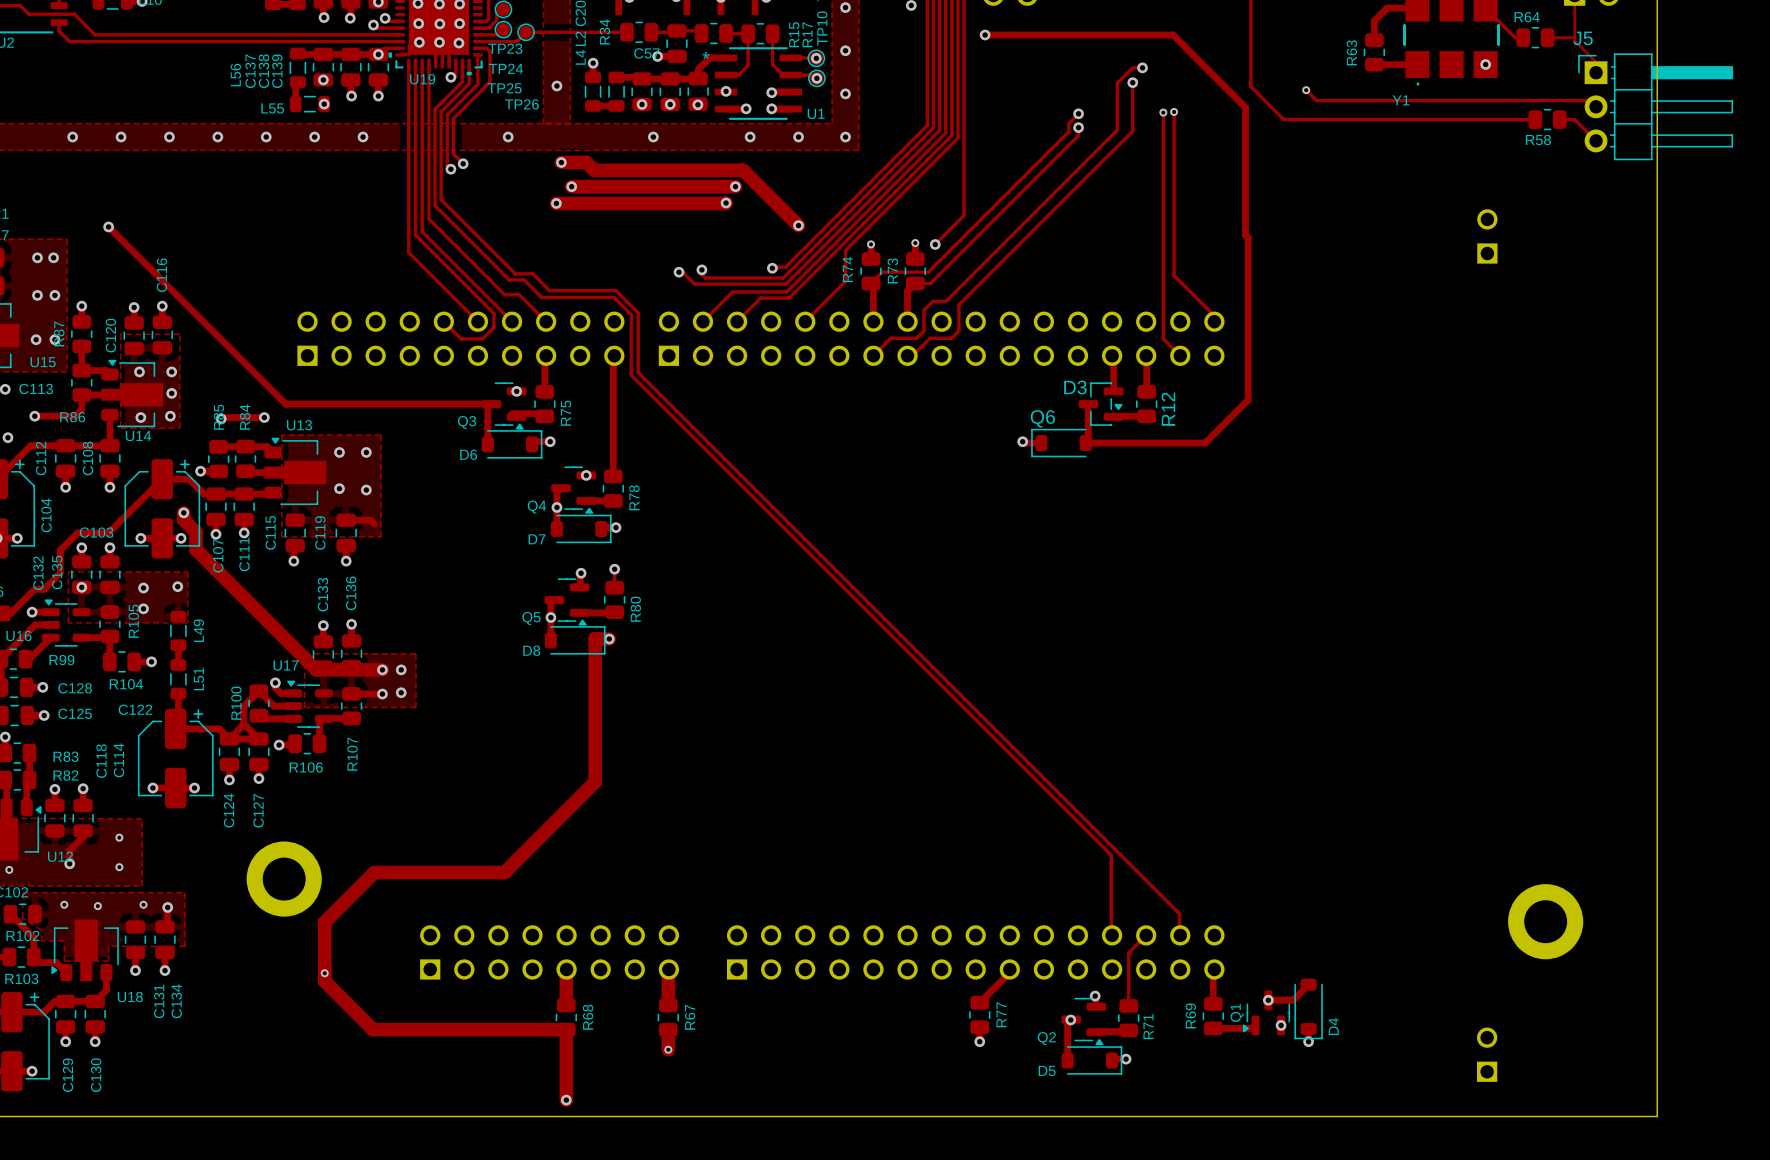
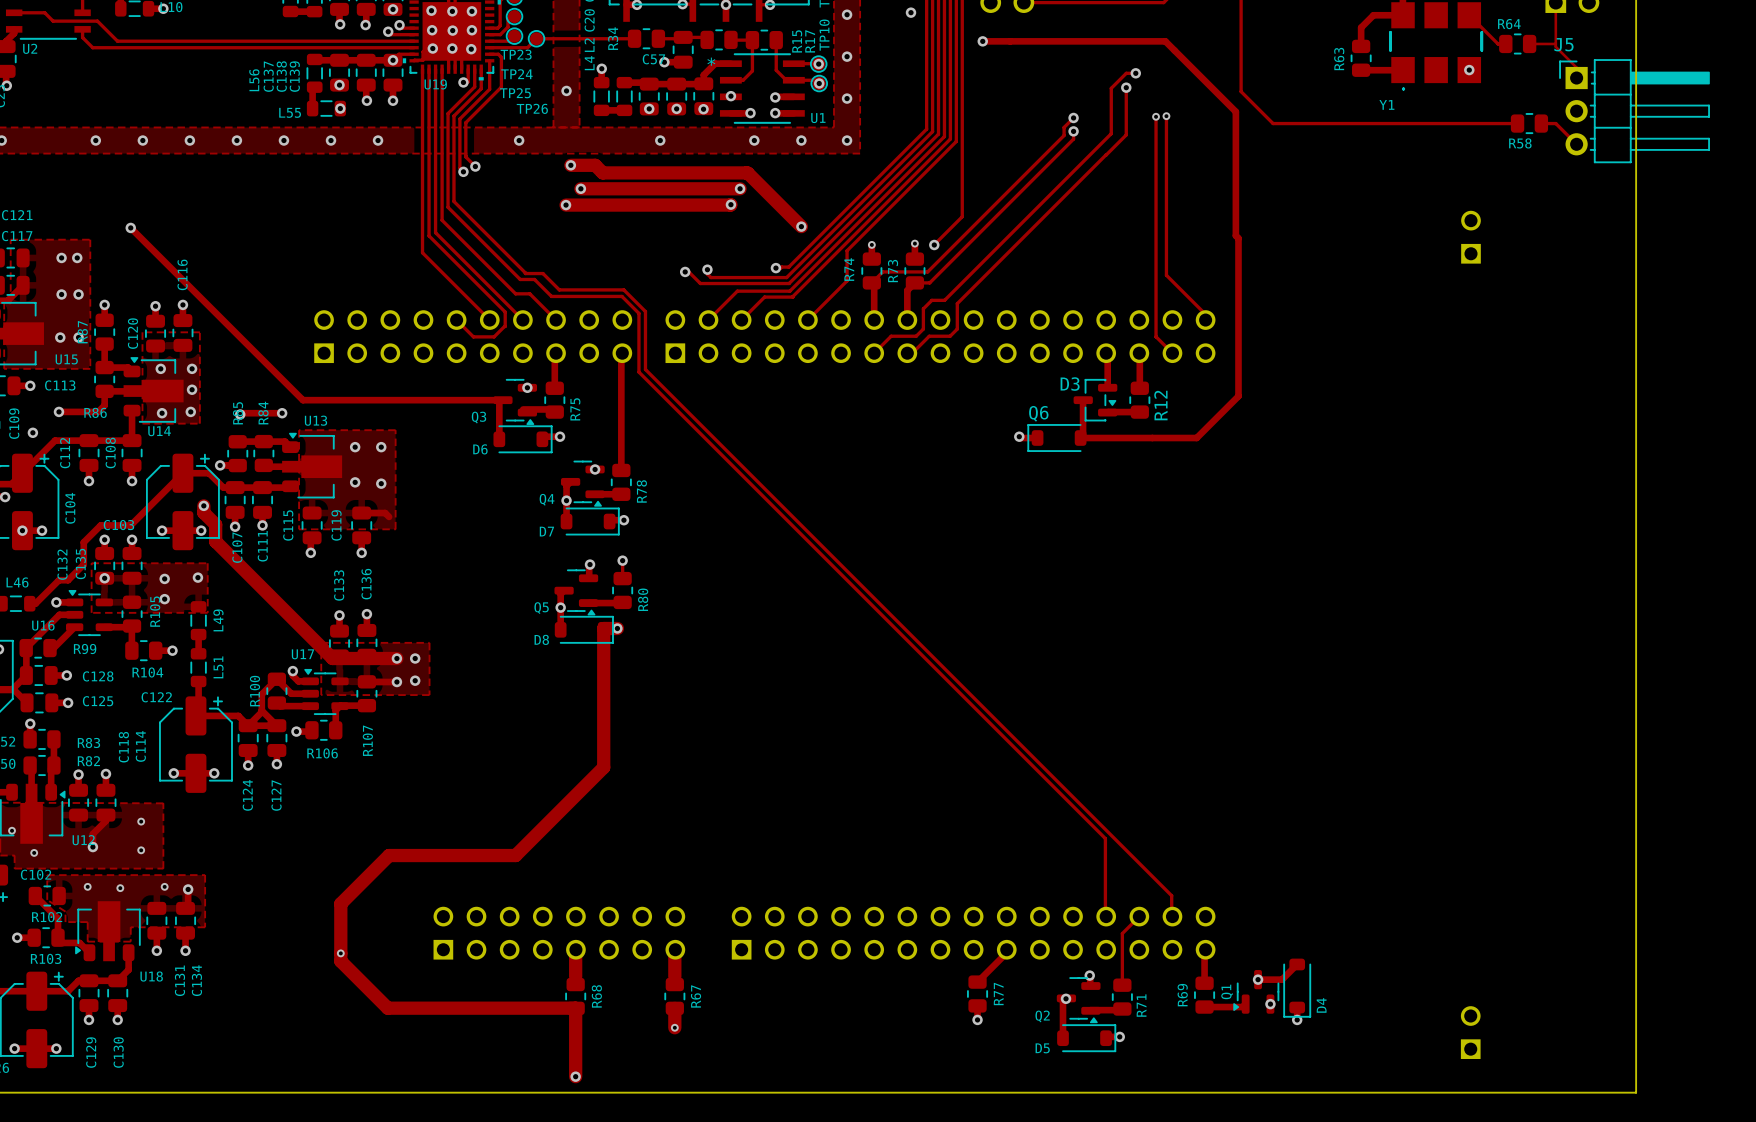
track: (1306, 90) (1316, 100) (1589, 100) (1596, 106) -> none
via: (1306, 90) -> none
part: (284, 879) -> none
part: (1545, 921) -> none

